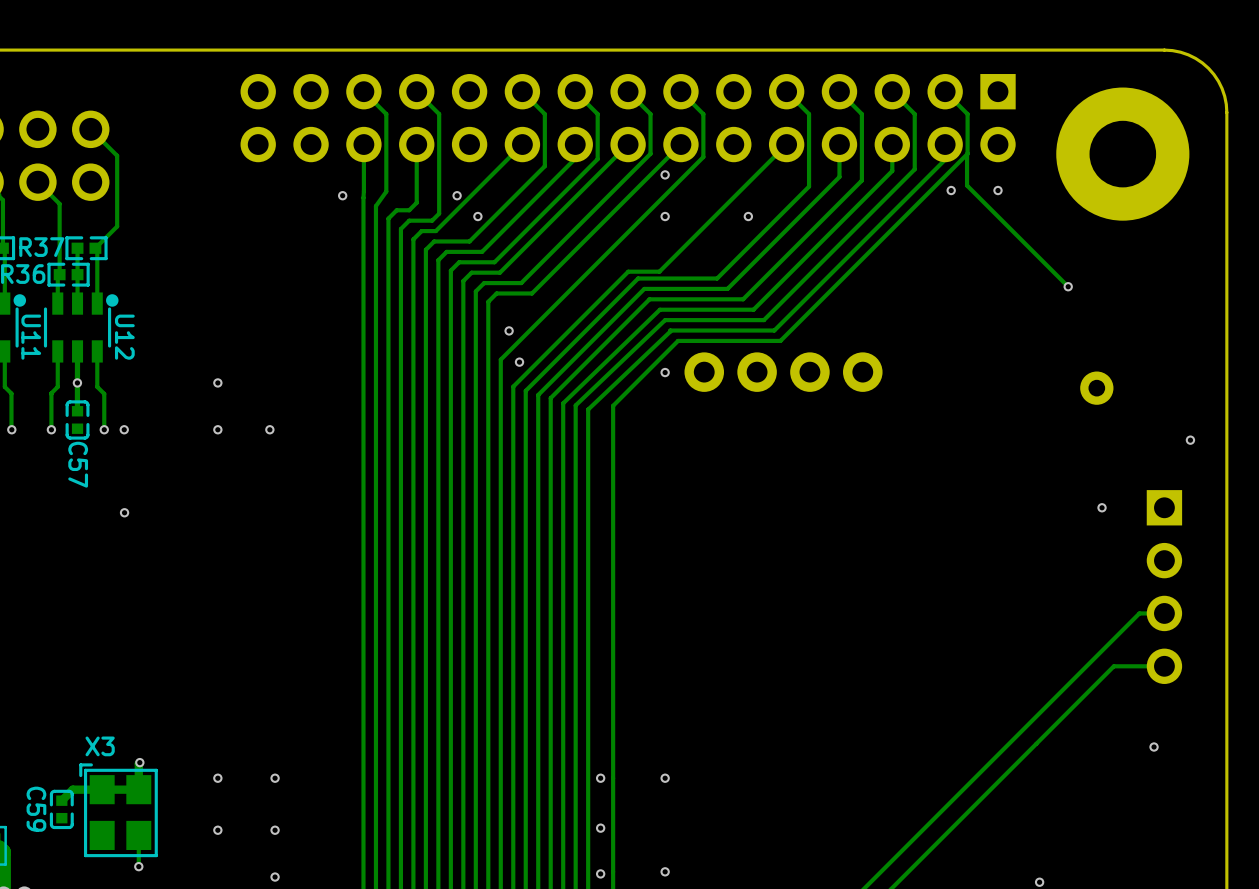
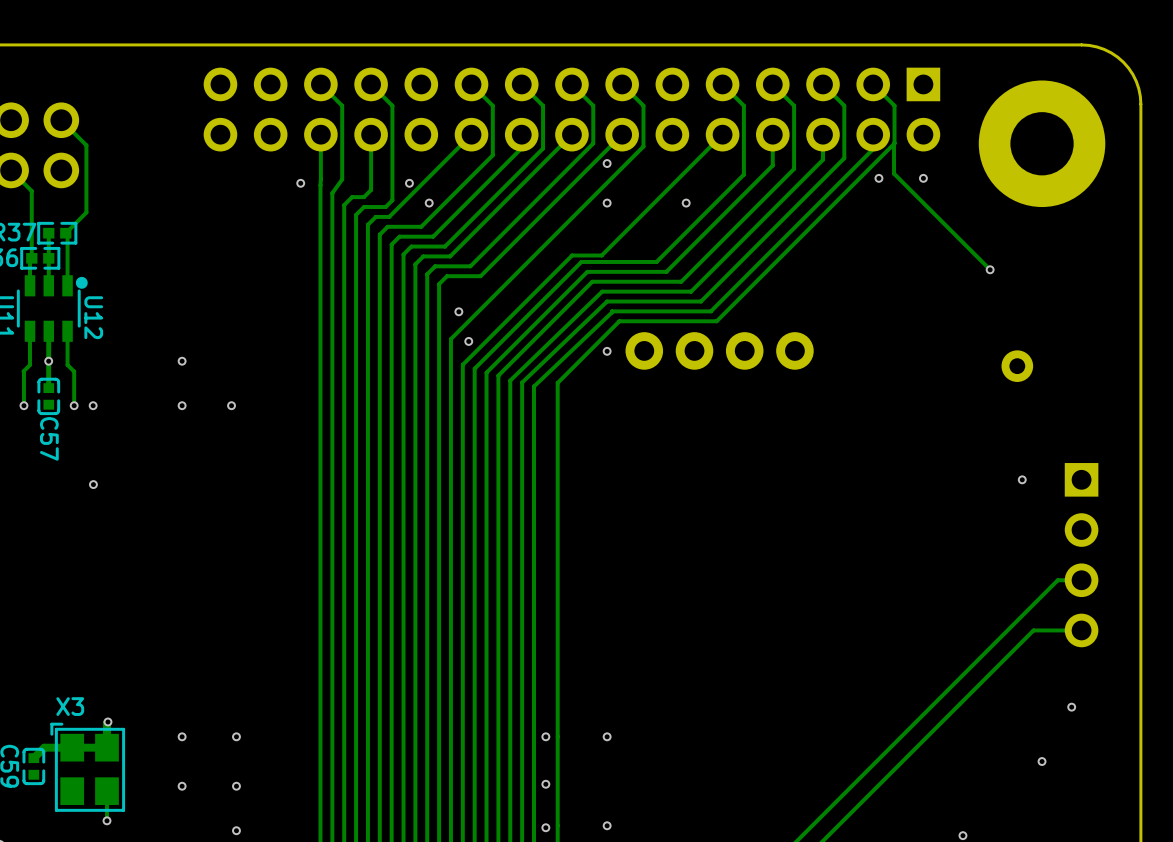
via: (1190, 440) -> none
via: none -> (1042, 761)

